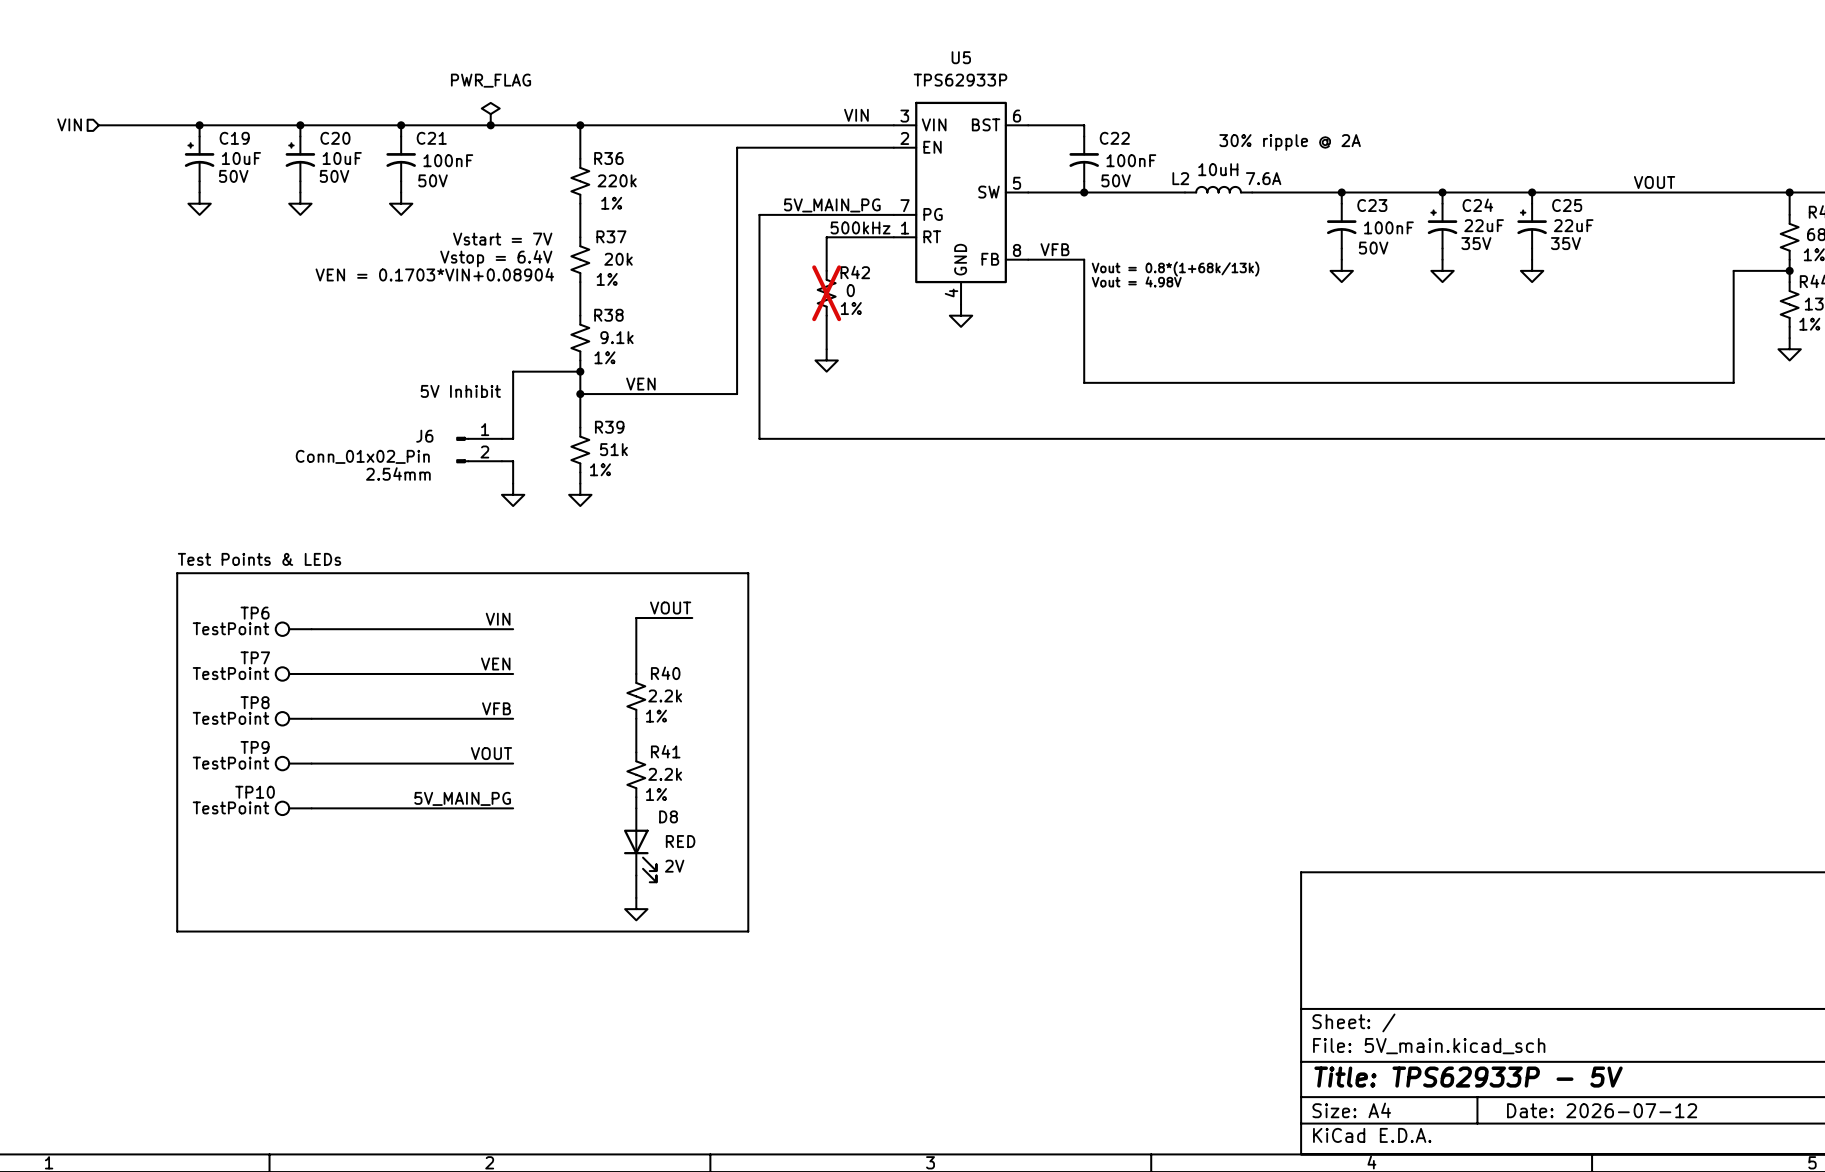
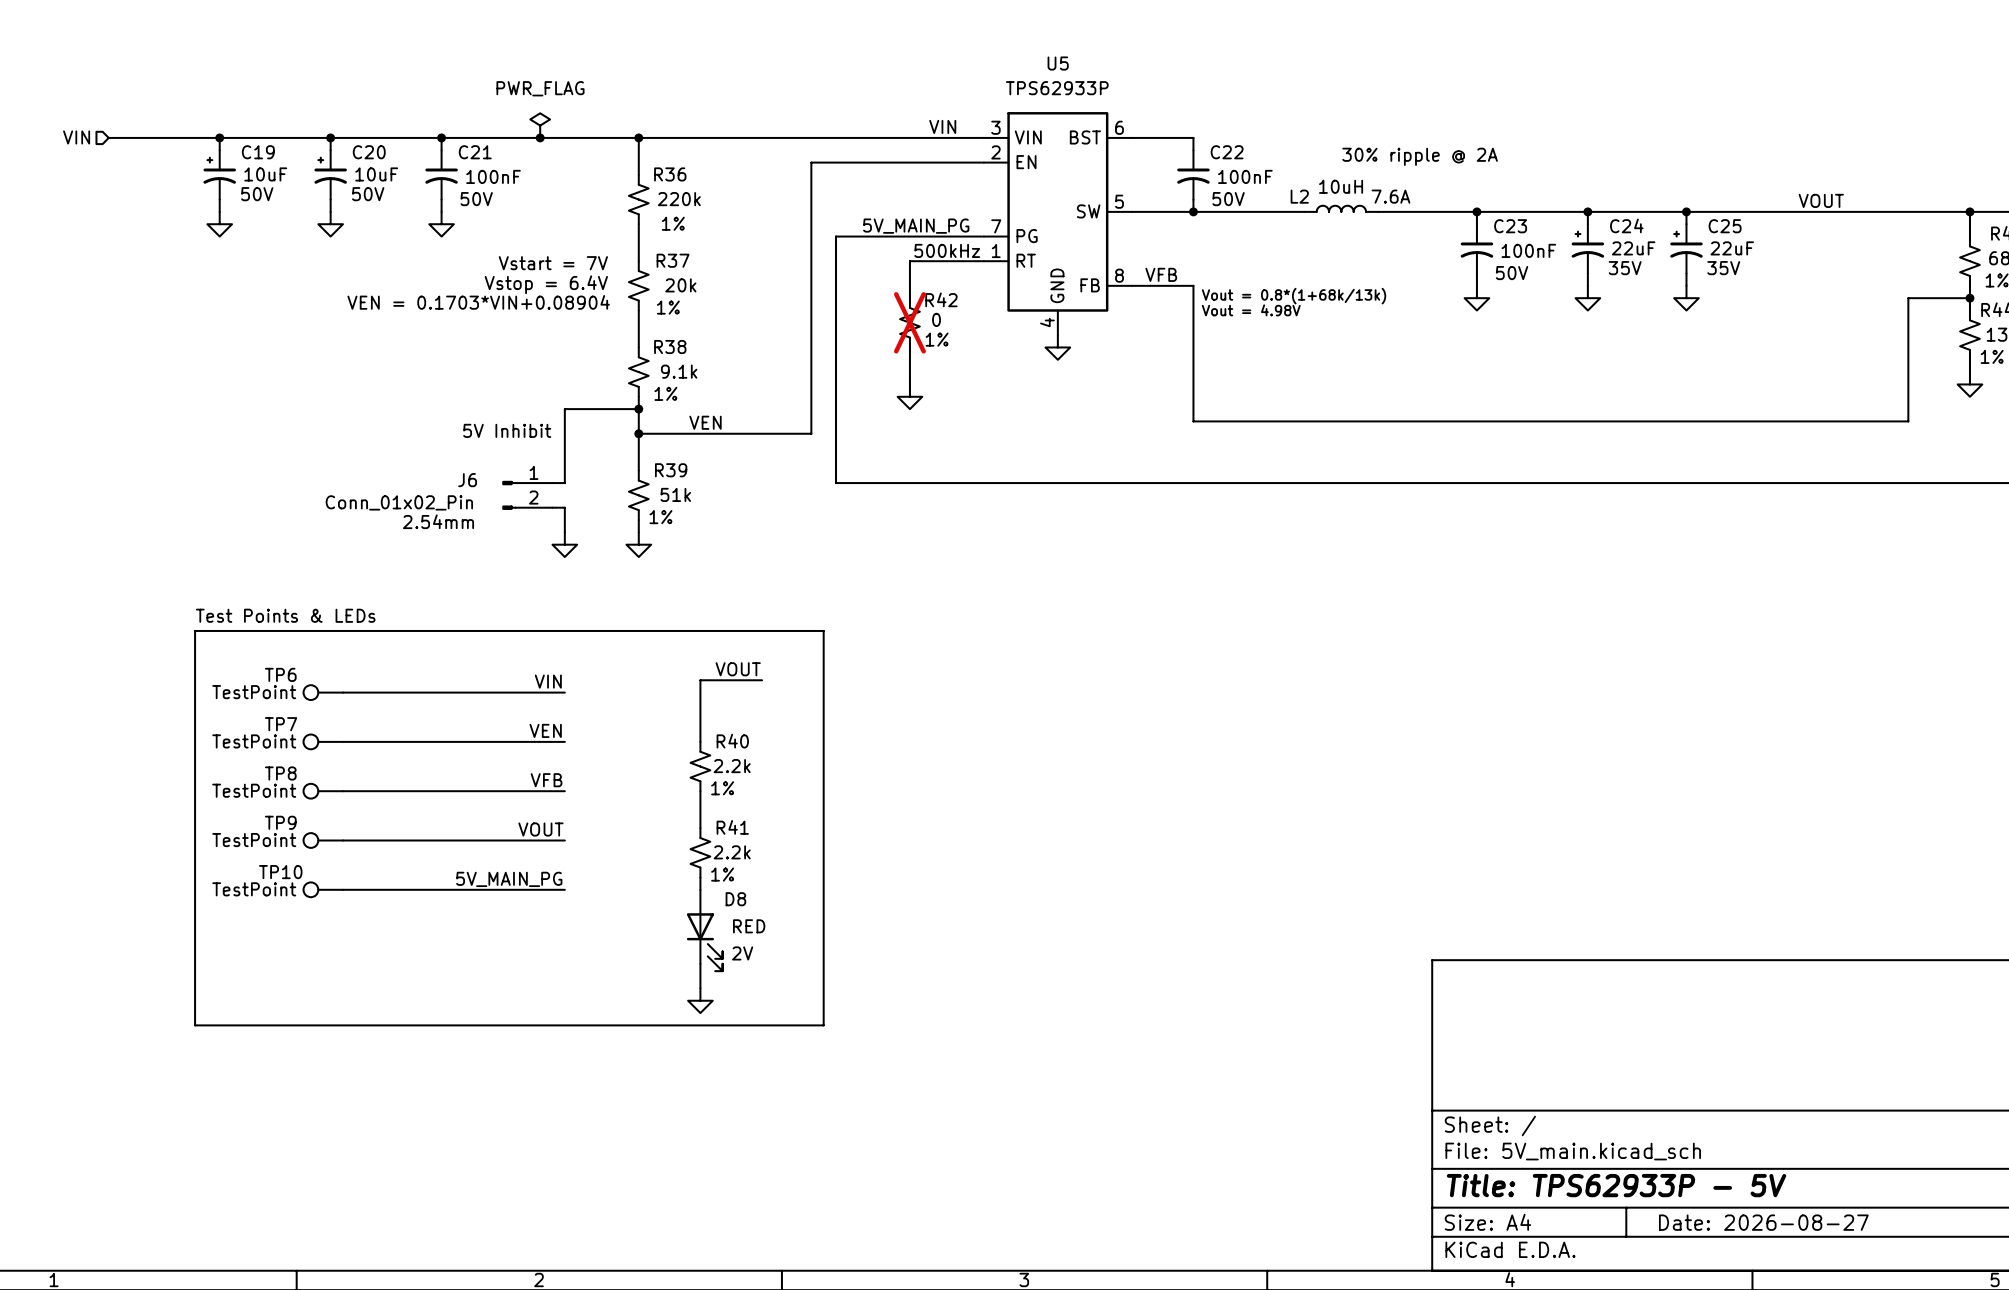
title block: Date: 2026-07-12 (1602, 1110) -> Date: 2026-08-27 (1763, 1222)

